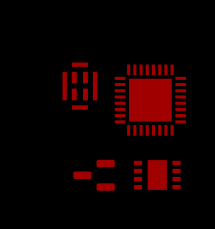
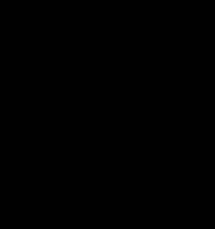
part: (79, 86) -> none
part: (150, 100) -> none
part: (94, 175) -> none
part: (157, 175) -> none

